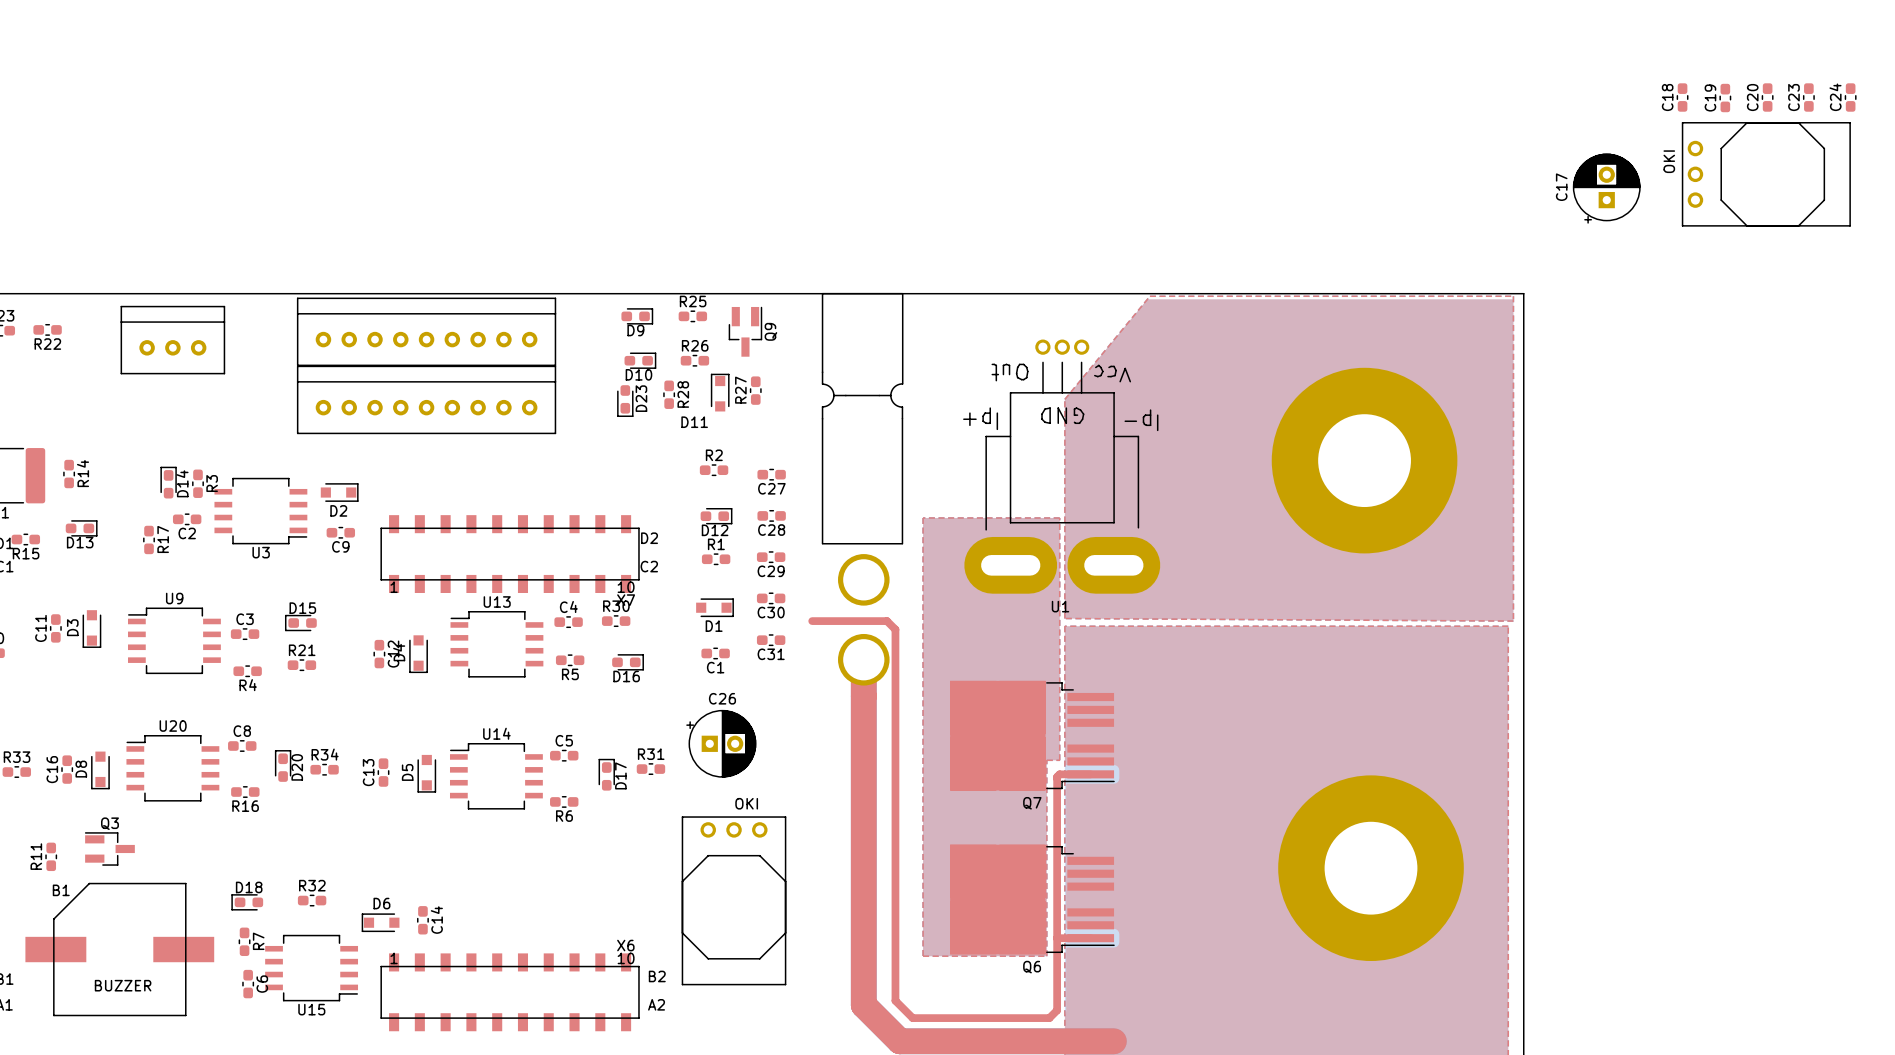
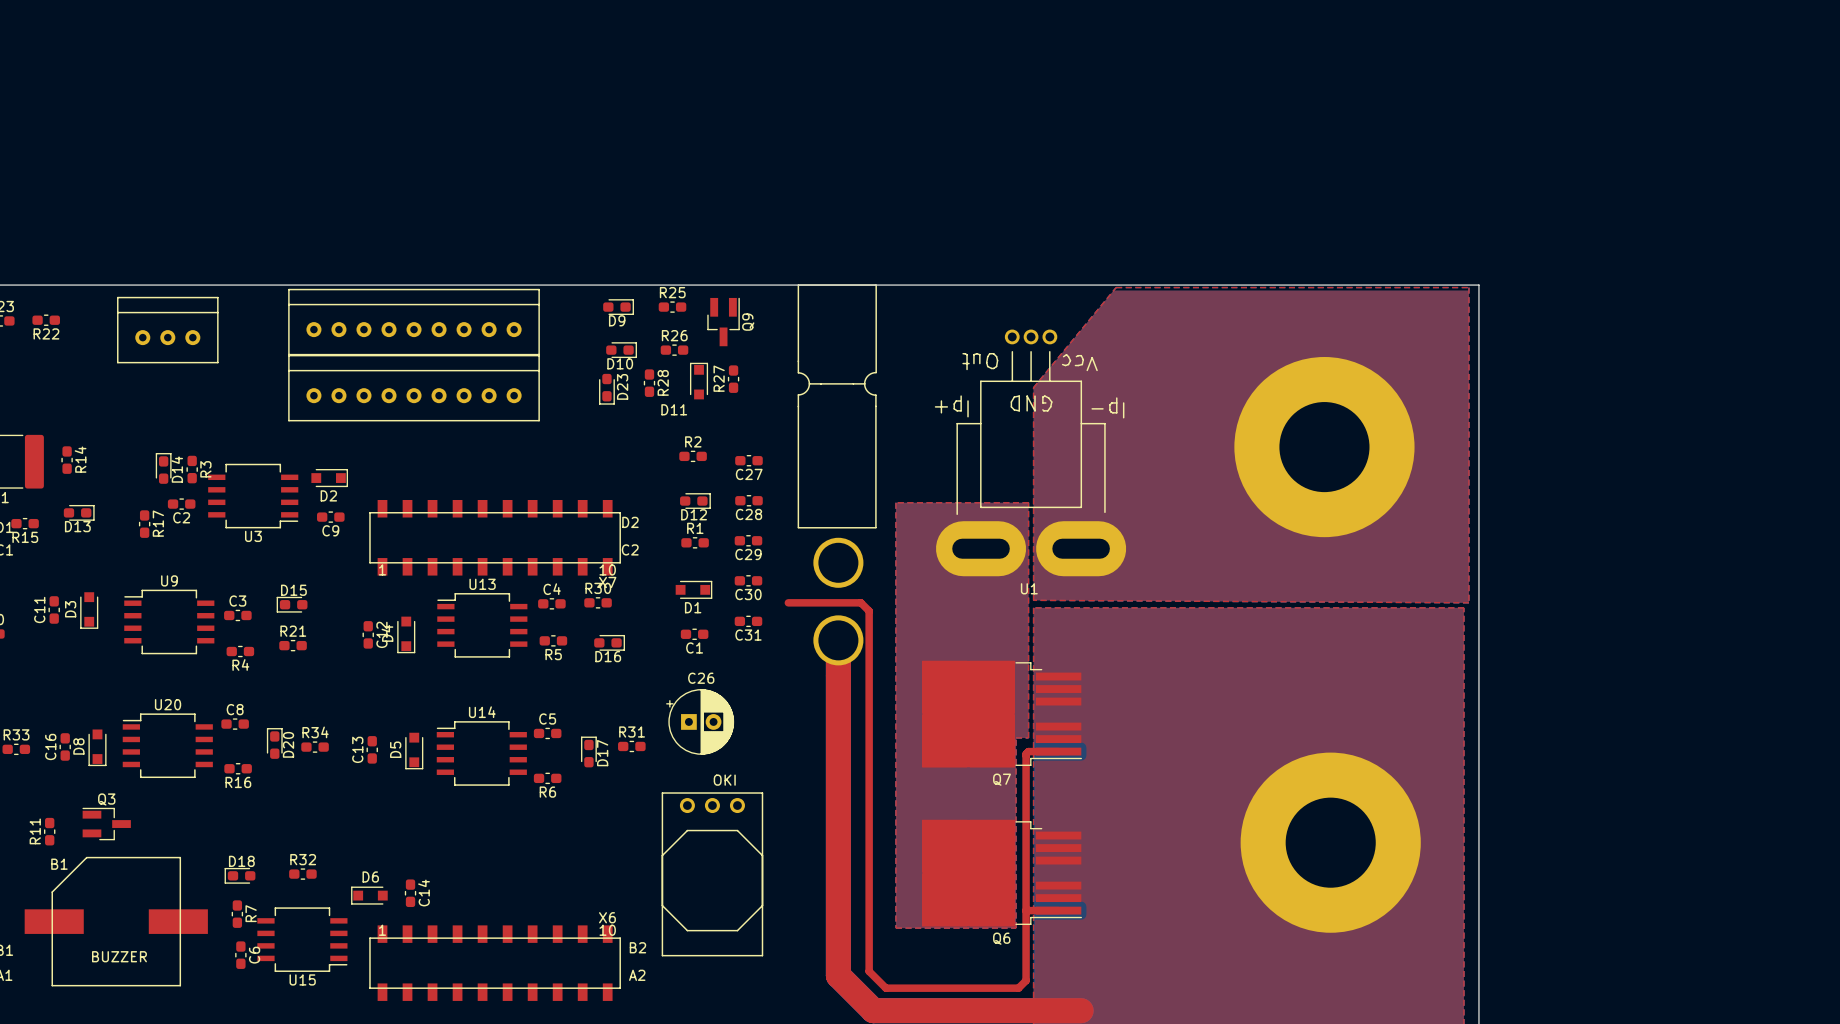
C18: (1682, 97) -> none
C20: (1767, 97) -> none
C23: (1808, 97) -> none
C24: (1850, 97) -> none
C19: (1725, 98) -> none
part: OKI (1766, 174) -> none
C17: (1606, 188) -> none

